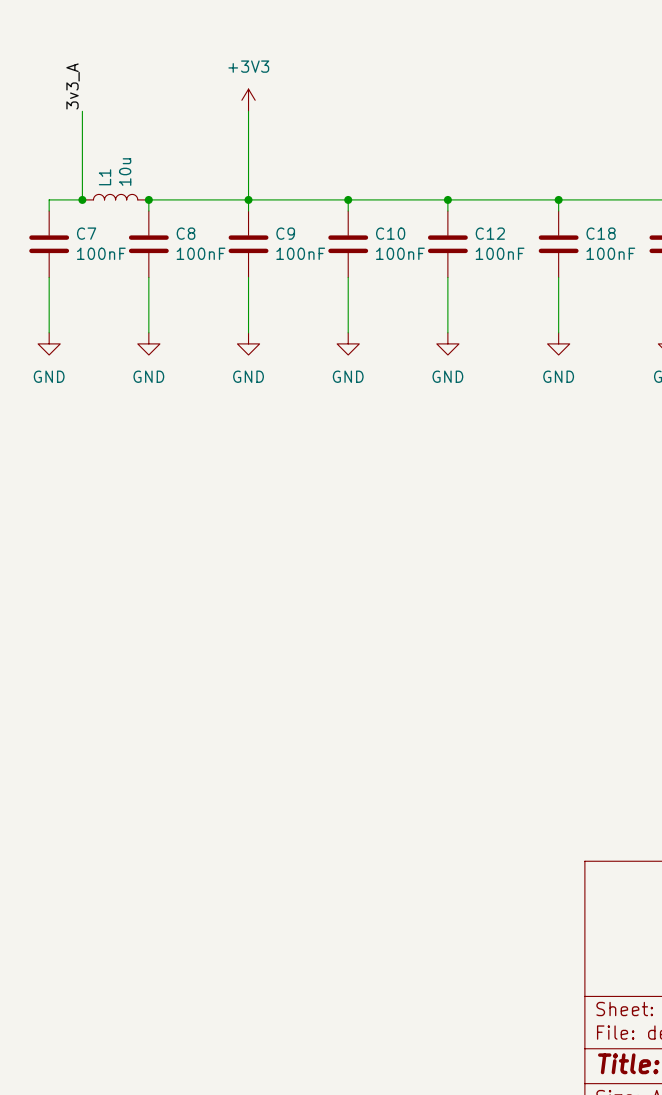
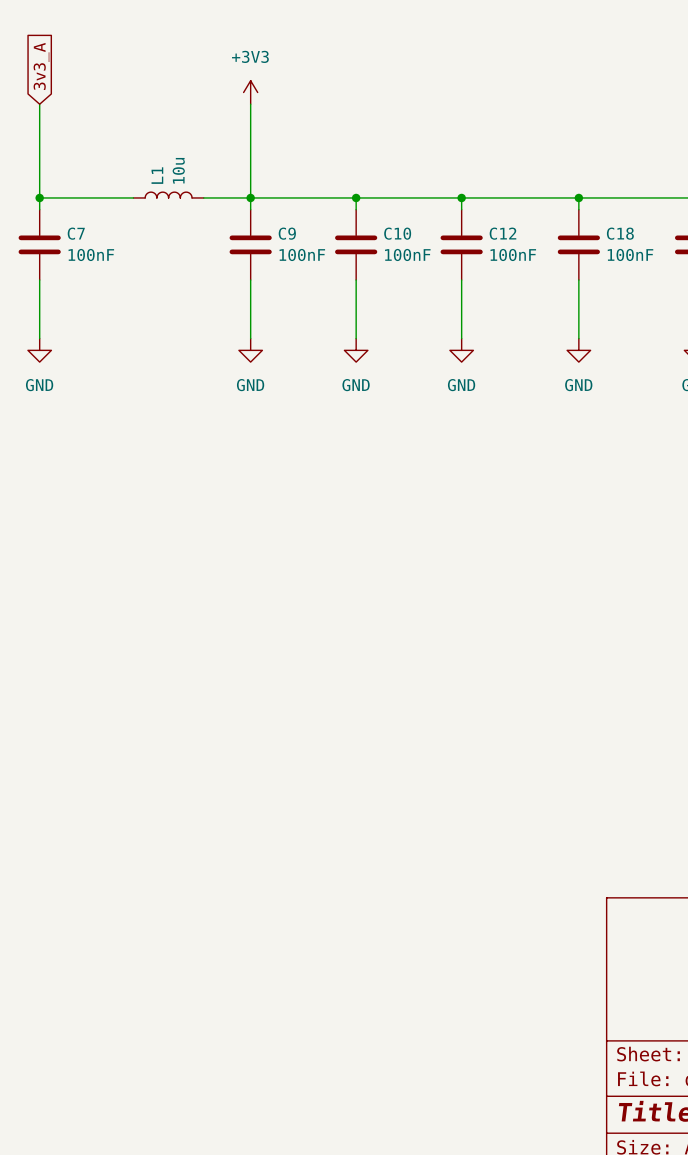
global label: none -> 3v3_A (41, 66)
label: 3v3_A (73, 86) -> none
wire: none -> (39, 104) (39, 197)
wire: (82, 111) (82, 199) -> (133, 197) (74, 197)
L1 position: (115, 197) -> (168, 195)
junction position: (82, 199) -> (39, 197)
junction: (148, 199) -> none
wire: (204, 199) (148, 199) (148, 211) -> none
C8: 100nF (148, 244) -> none
wire: (148, 277) (148, 332) -> none
power symbol: GND (148, 343) -> none

